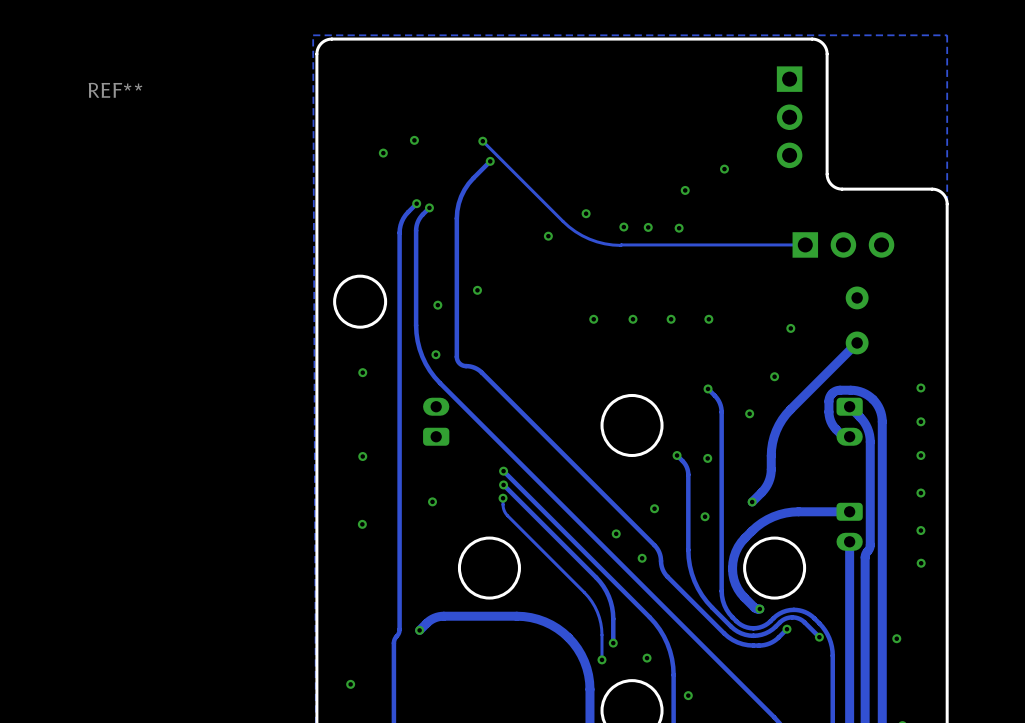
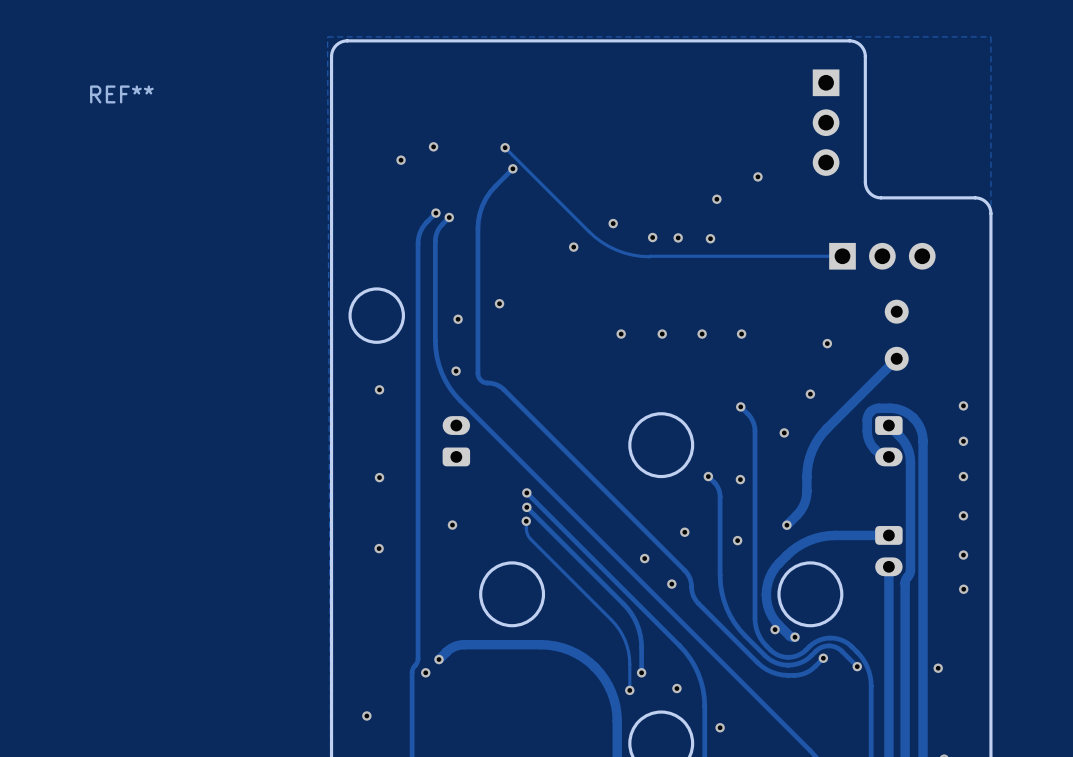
via: none -> (775, 629)
via: none -> (425, 672)

